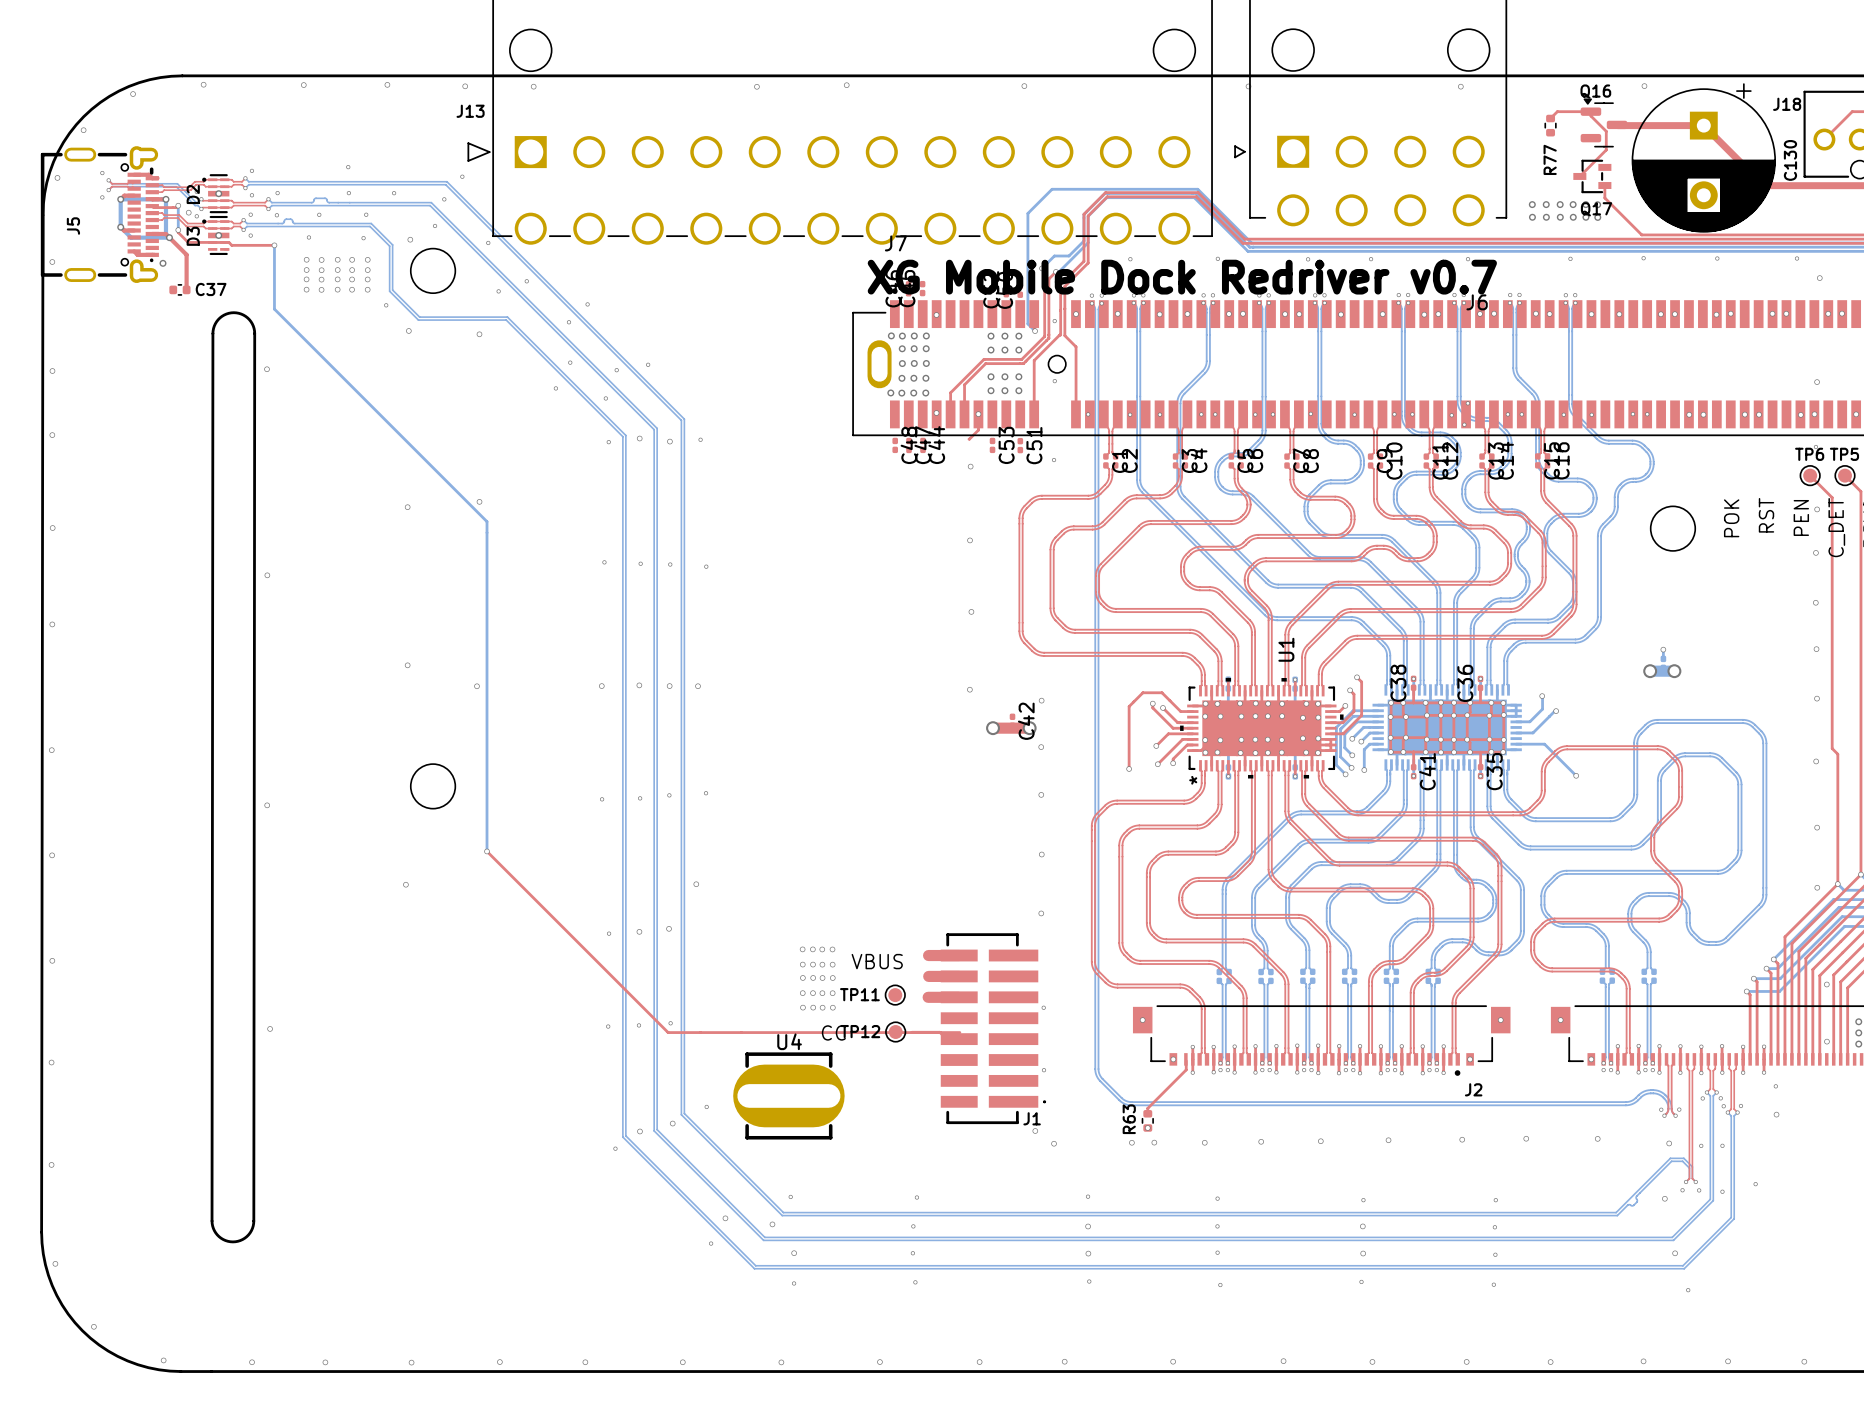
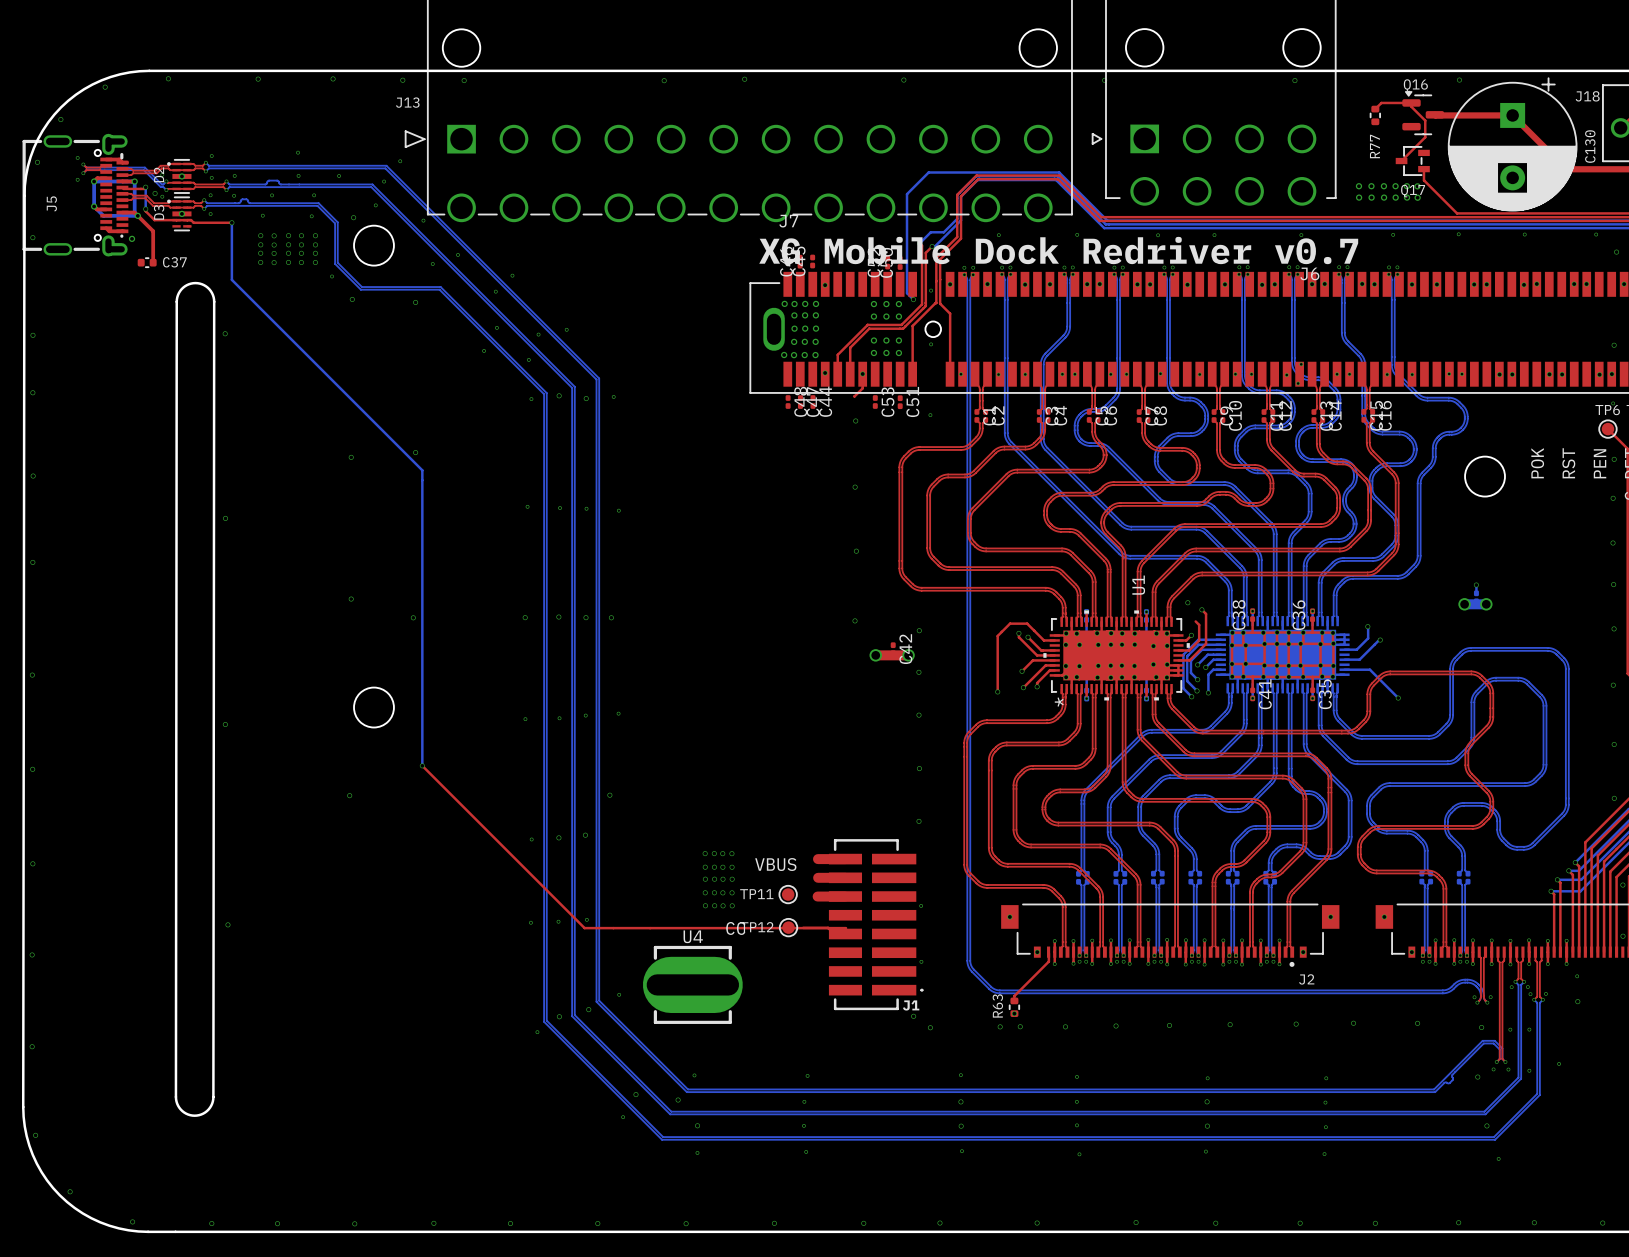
via position: (1350, 690) -> (1187, 602)

